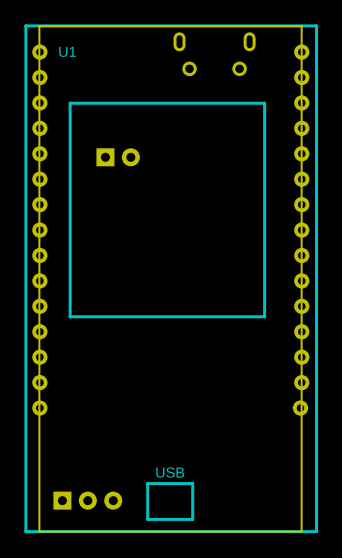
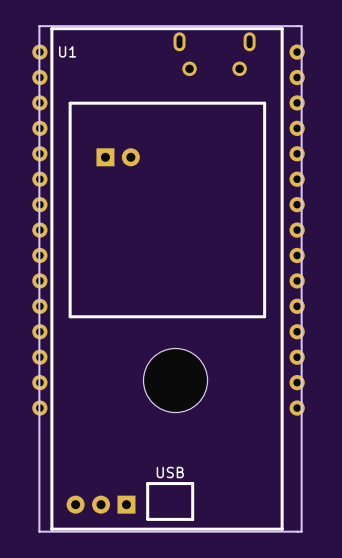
U1 footprint: [24, 24, 319, 534] -> [32, 27, 305, 531]
part: none -> (175, 380)
part rotation: 0° (87, 500) -> 180° (101, 504)

